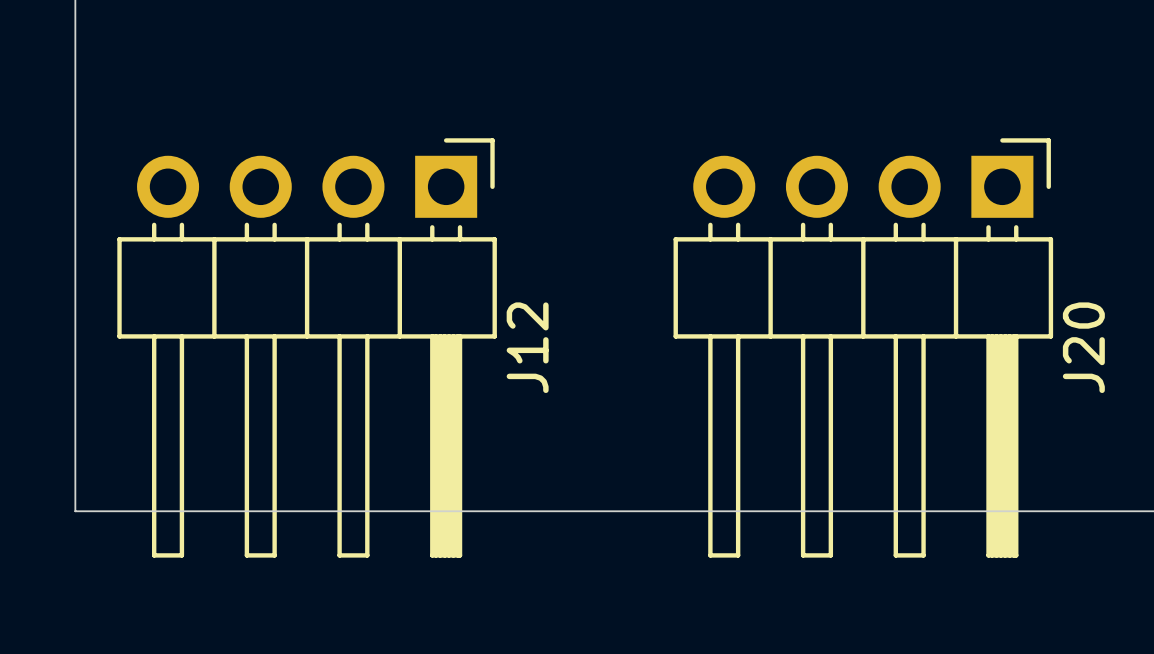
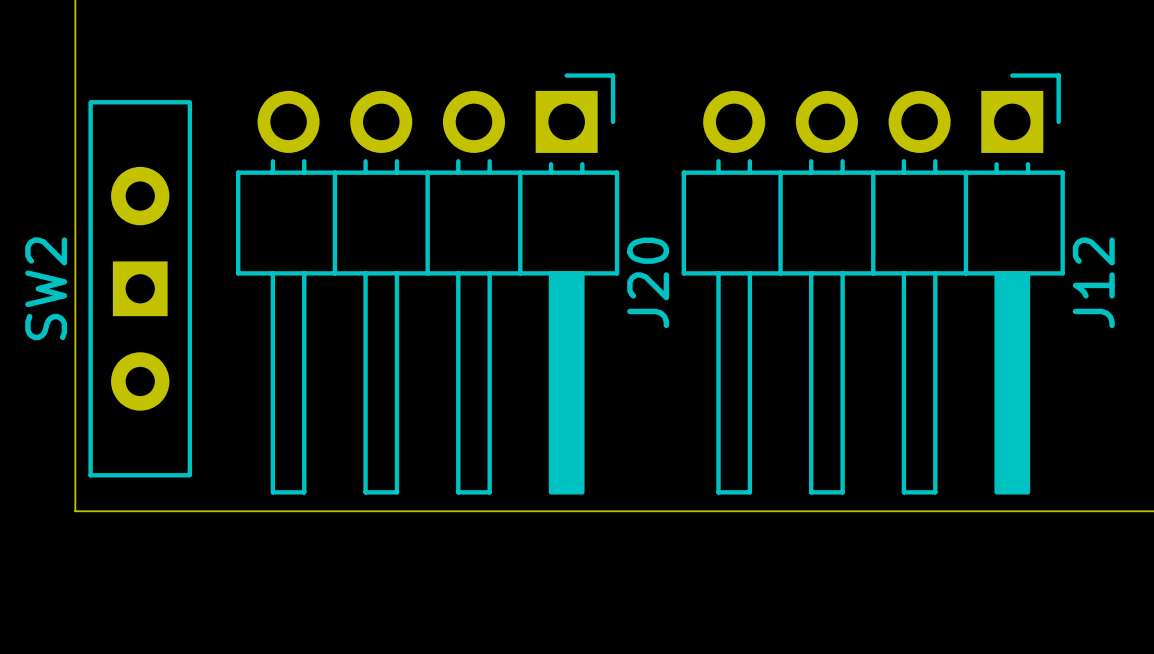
J12 footprint: [117, 138, 497, 558] -> [681, 73, 1065, 495]
J20 footprint: [673, 138, 1054, 558] -> [236, 73, 620, 495]
SW2: none -> (140, 288)

